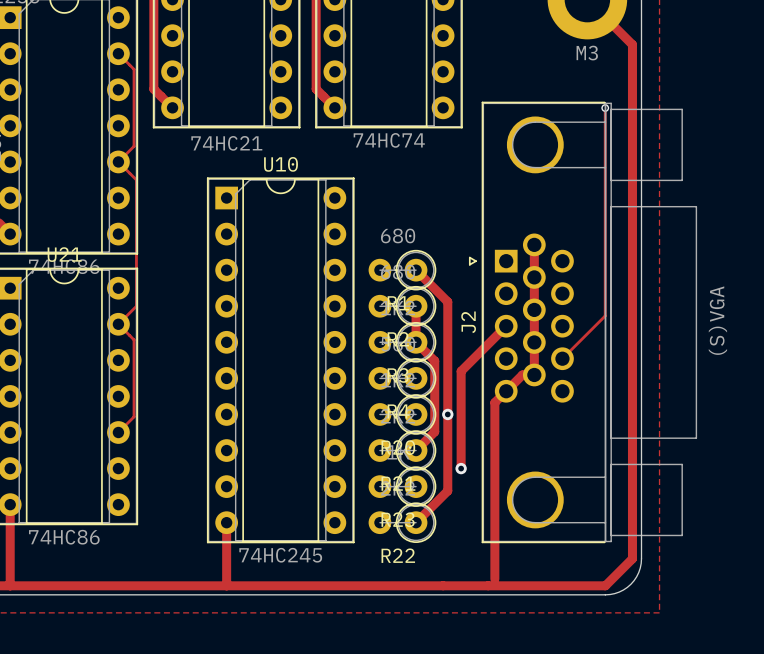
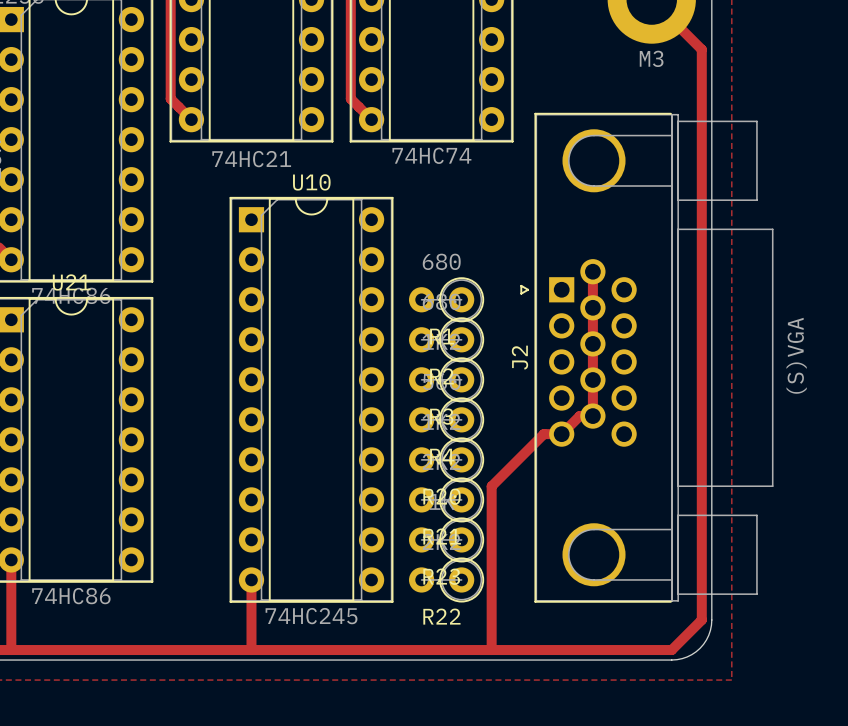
track: (118, 53) (134, 69) (134, 146) (118, 161) (136, 179) (136, 306) (118, 324) (134, 339) (134, 416) (118, 432) -> none
track: (605, 108) (605, 315) (562, 358) -> none
via: (605, 108) -> none
track: (416, 270) (447, 301) (447, 490) (416, 522) -> none
track: (416, 306) (416, 342) (434, 361) (434, 431) (416, 450) -> none
track: (506, 326) (461, 371) (461, 468) -> none
track: (506, 391) (494, 402) (494, 579) -> (561, 434) (543, 434) (491, 486) (491, 650)
via: (447, 414) -> none
via: (461, 468) -> none

